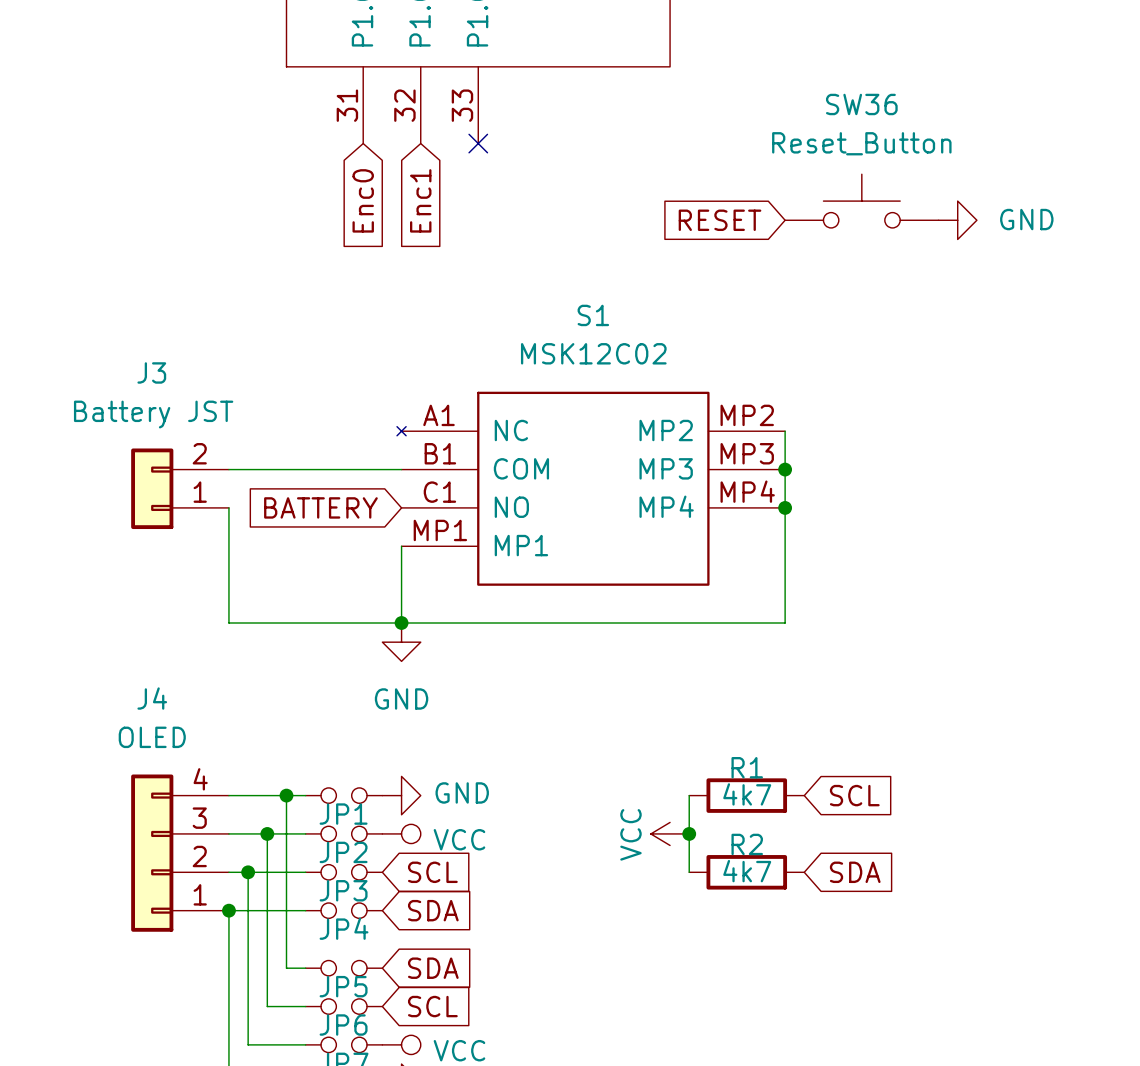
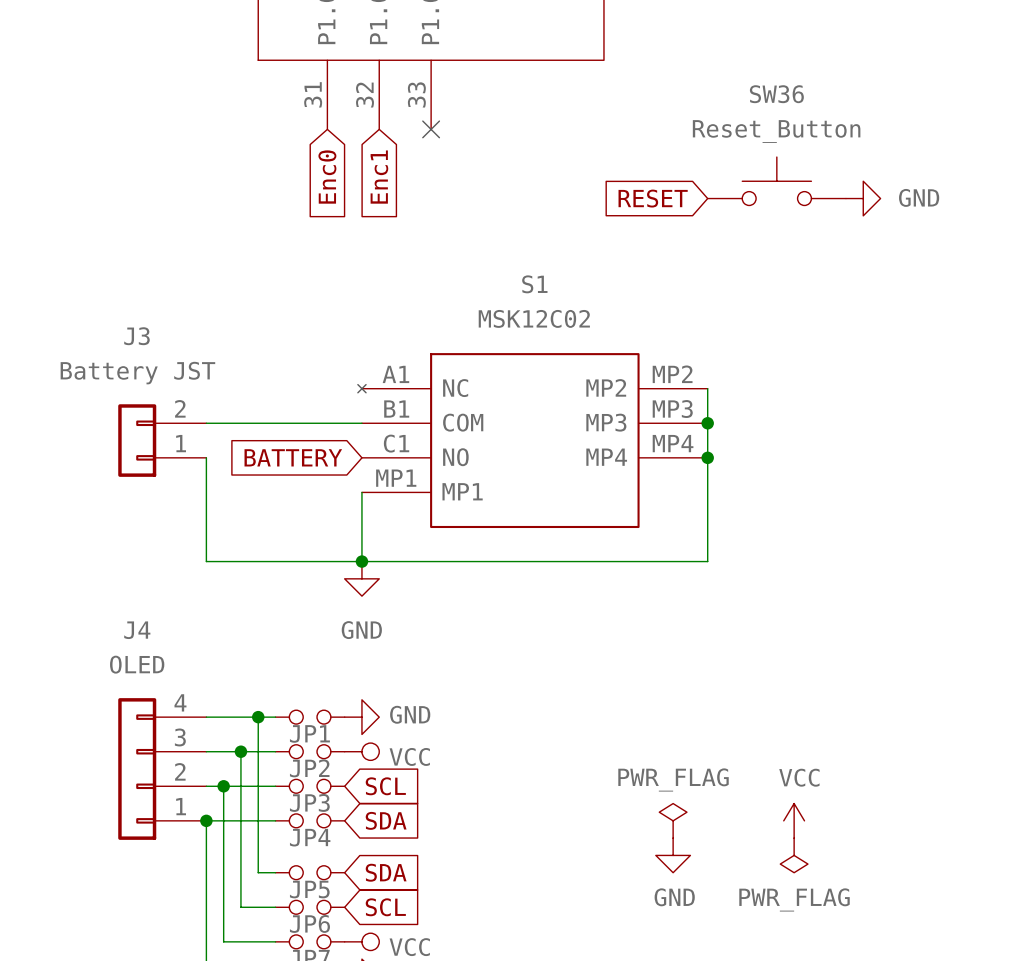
wire: (689, 795) (689, 872) -> none
R1: 4k7 (746, 795) -> none
global label: SCL (854, 795) -> none
power symbol rotation: 0° (670, 833) -> 90° clockwise (794, 820)
power symbol position: VCC (670, 833) -> VCC (794, 820)
junction: (689, 833) -> none
R2: 4k7 (746, 872) -> none
global label: SDA (855, 872) -> none
power symbol: none -> PWR_FLAG (673, 820)
power symbol: none -> GND (673, 855)
power symbol: none -> PWR_FLAG (794, 855)

